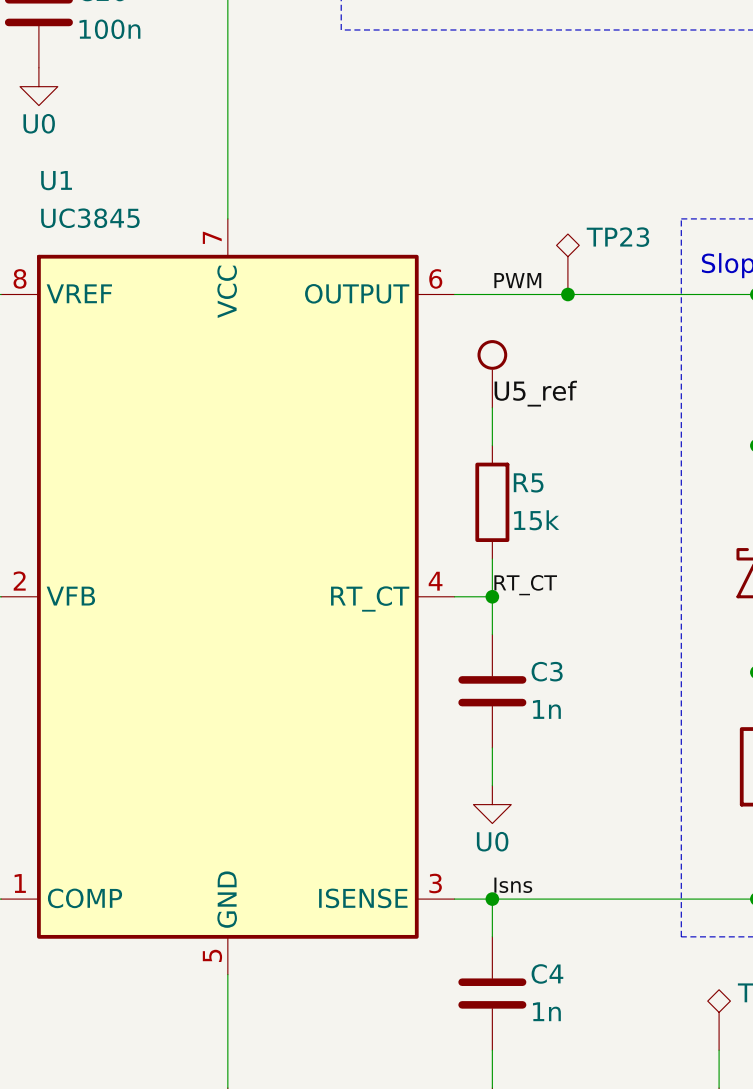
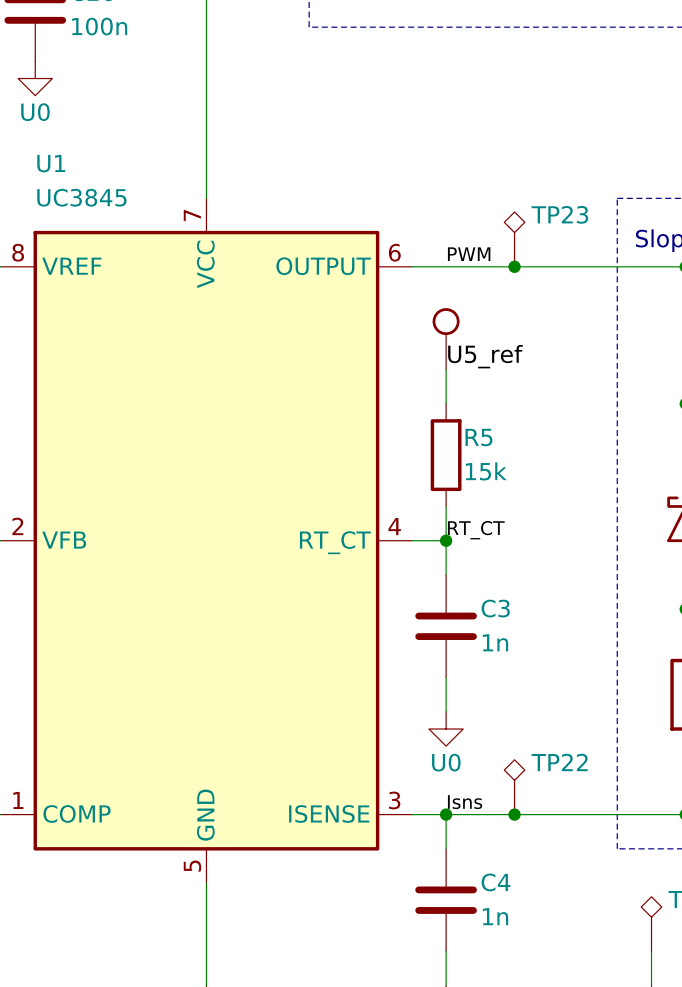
TP22: none -> (514, 787)
junction: none -> (514, 814)

